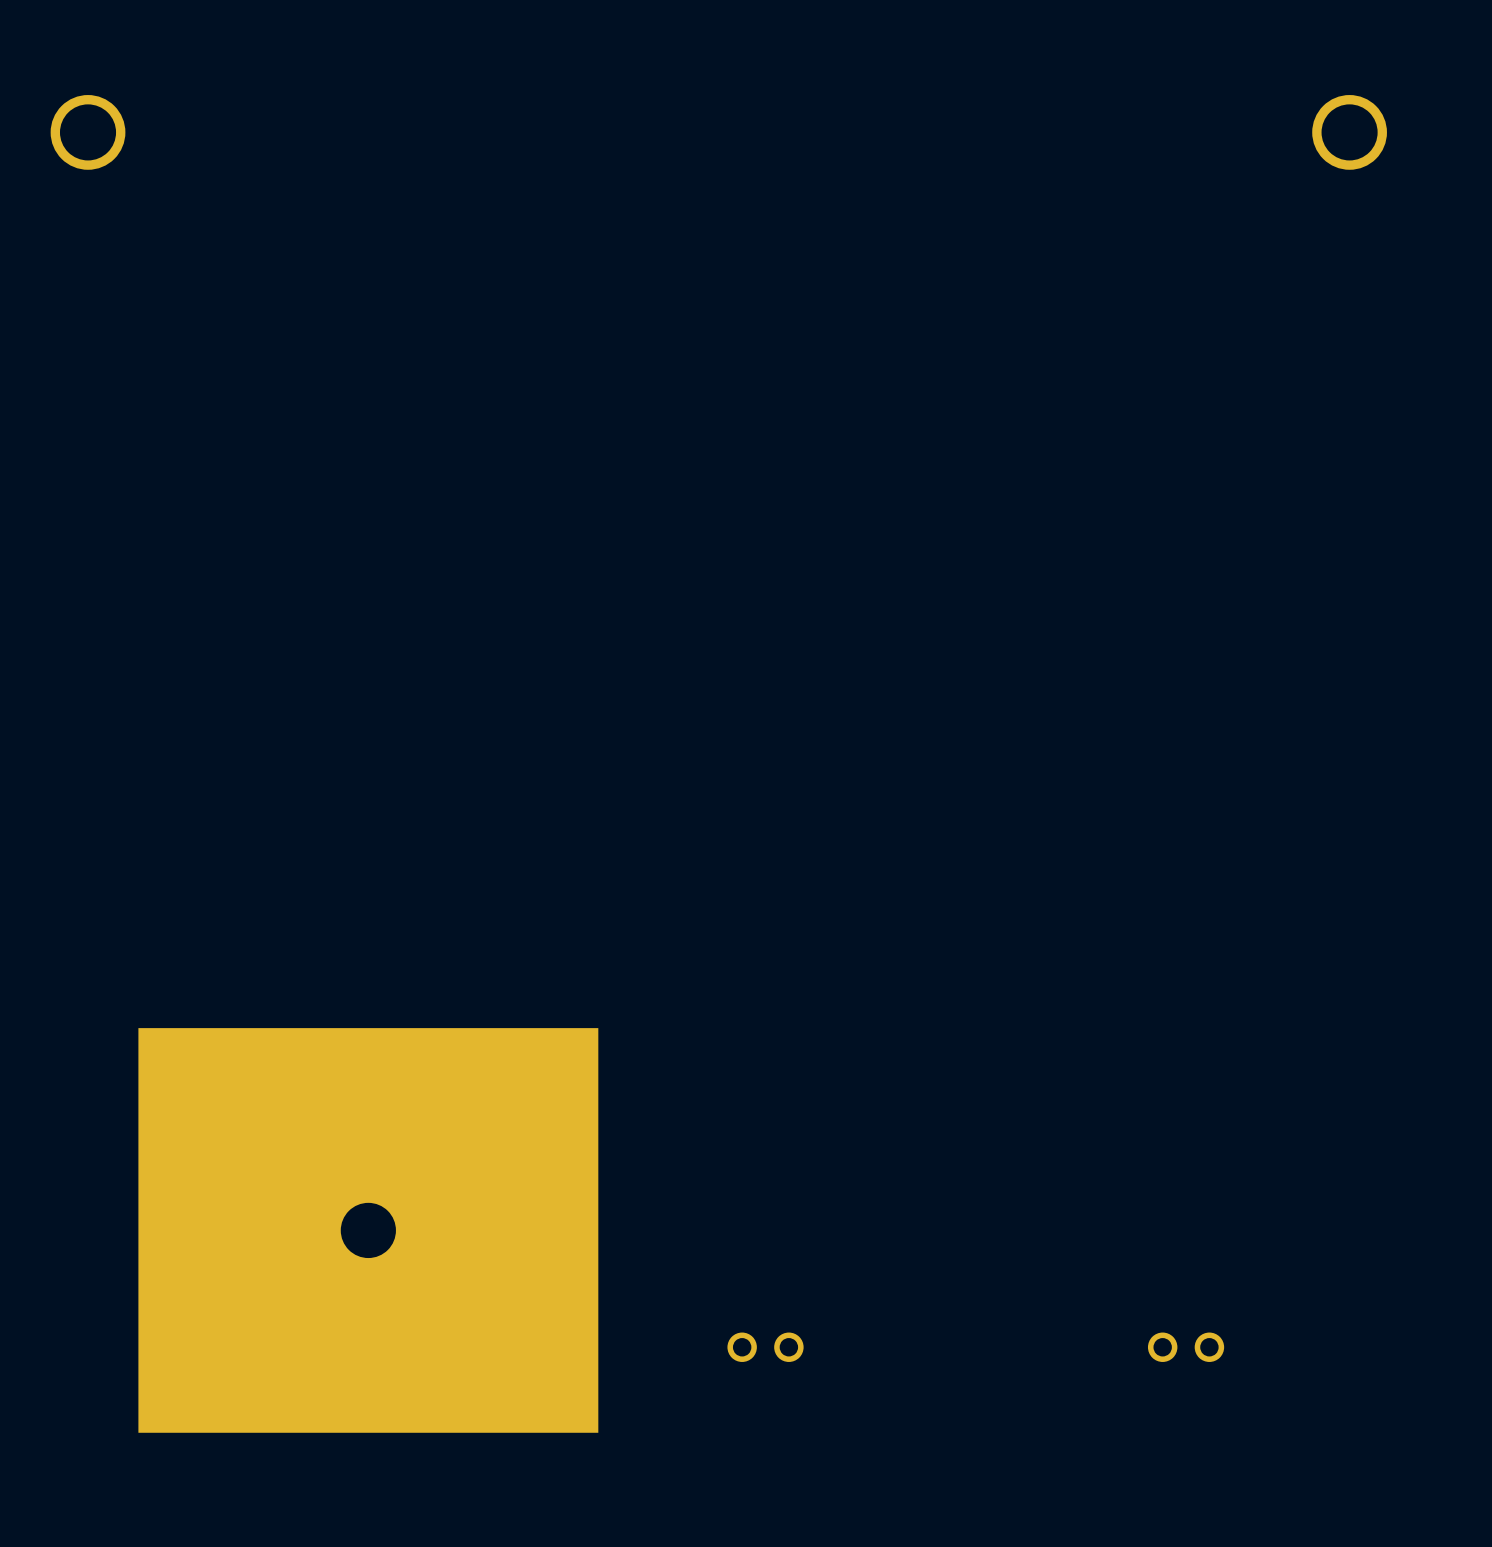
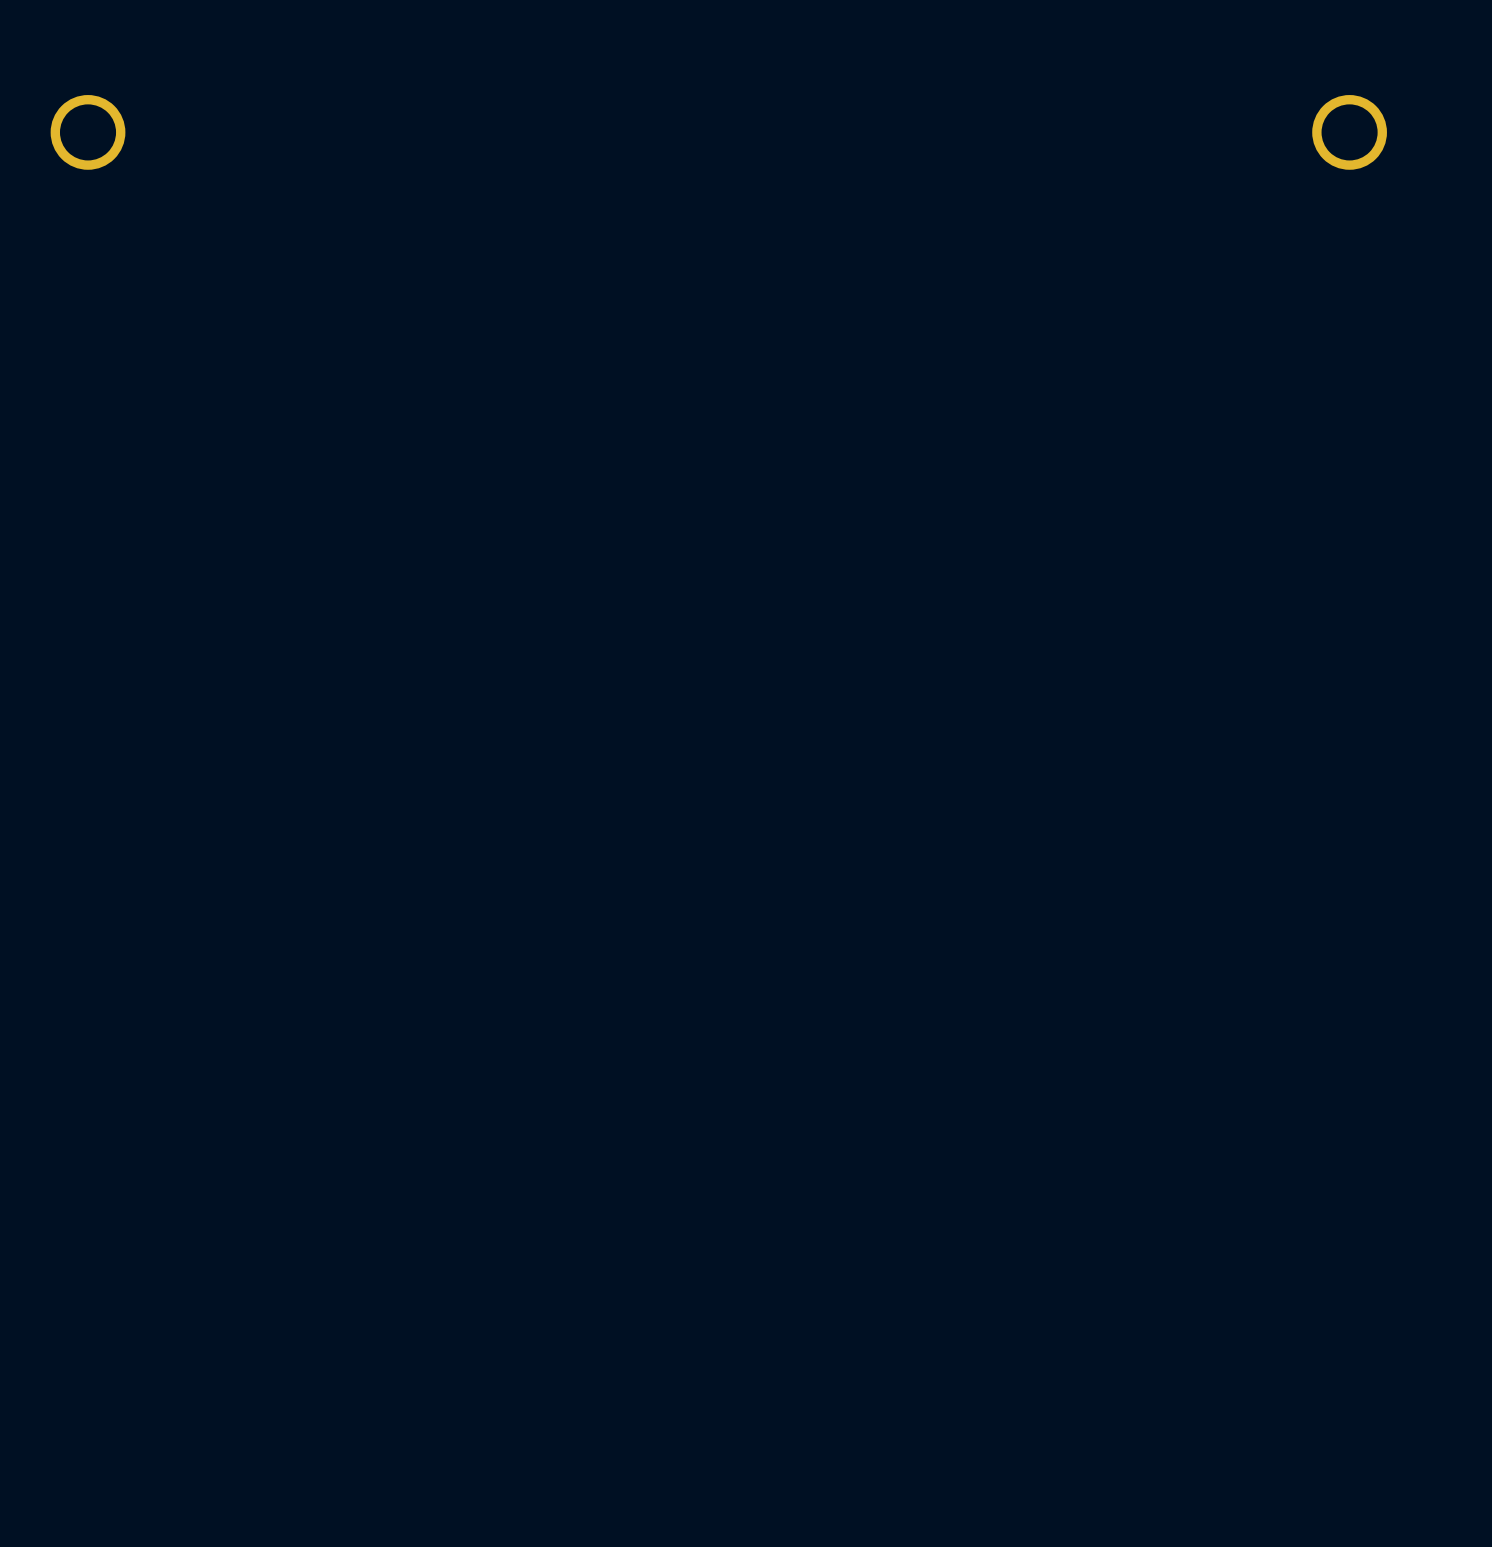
part: (368, 1230) -> none
part: (765, 1347) -> none
part: (1186, 1347) -> none

